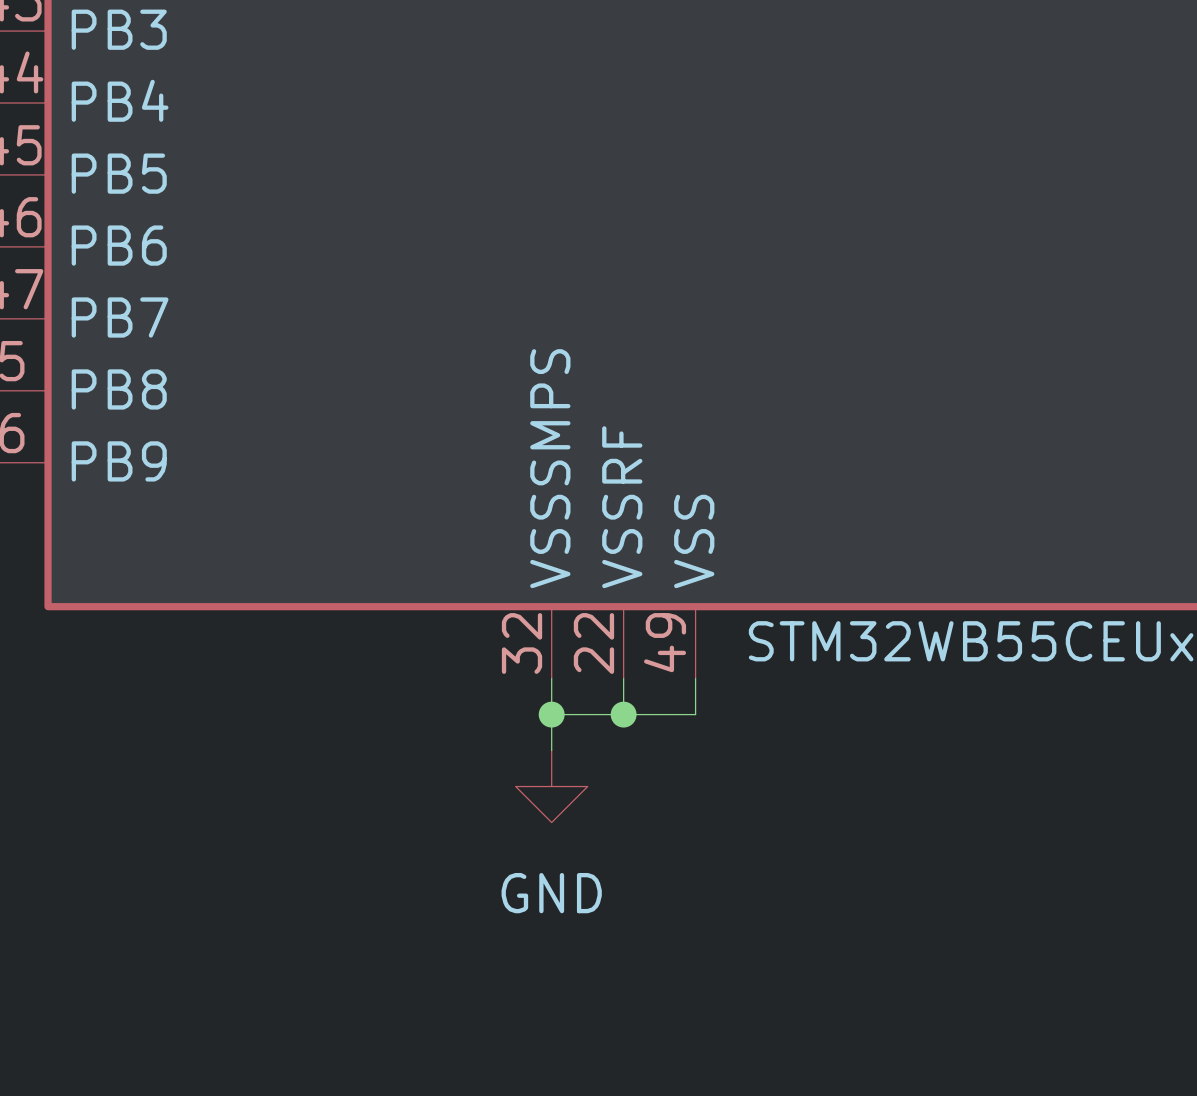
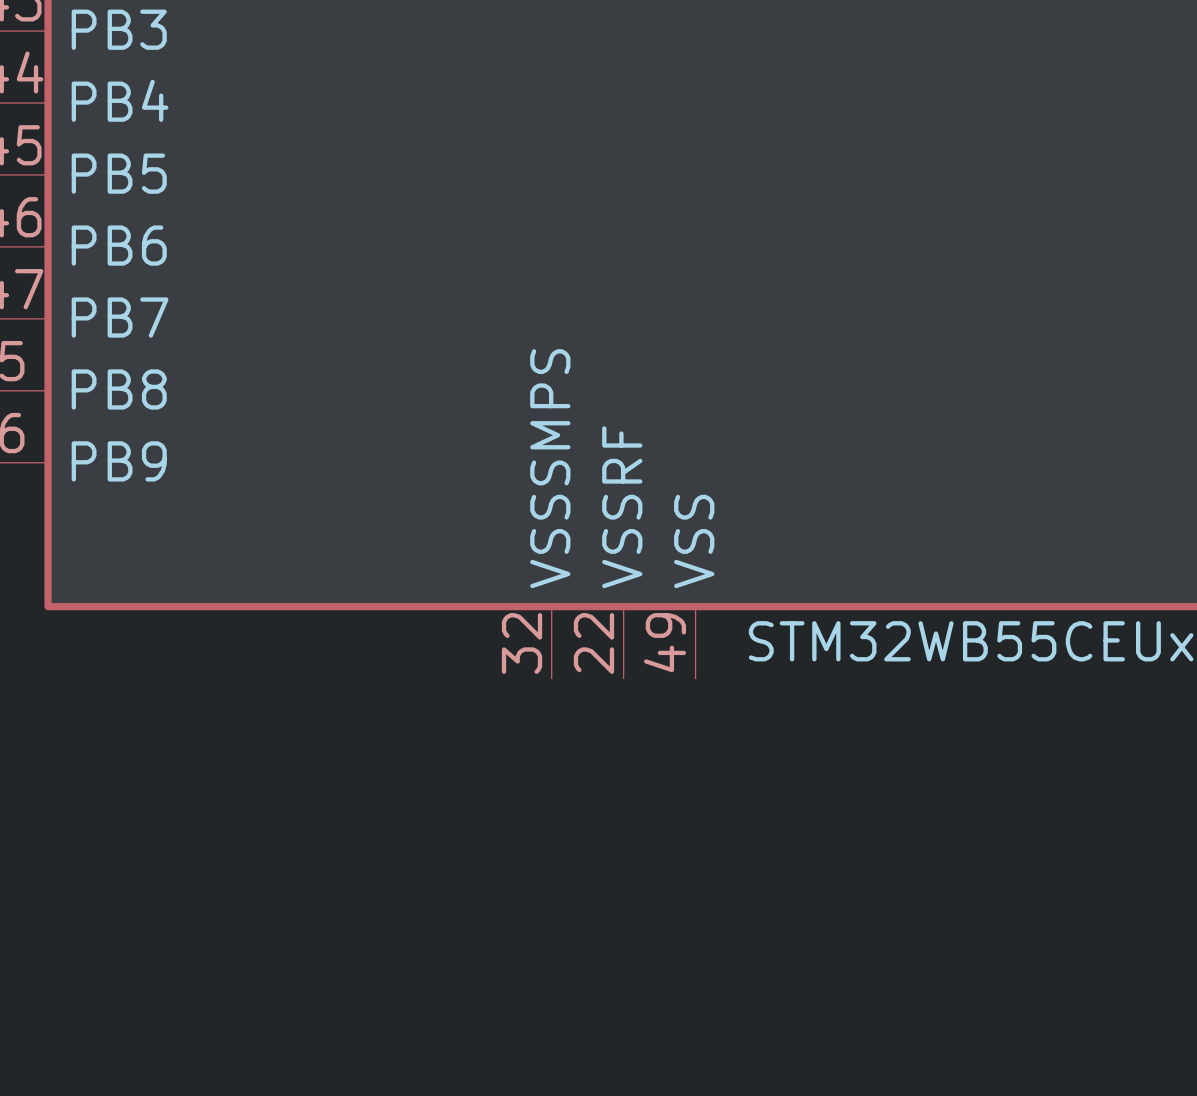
wire: (551, 678) (551, 750) -> none
wire: (623, 678) (623, 714) -> none
wire: (695, 678) (695, 714) (551, 714) -> none
junction: (551, 714) -> none
junction: (623, 714) -> none
power symbol: GND (551, 786) -> none

